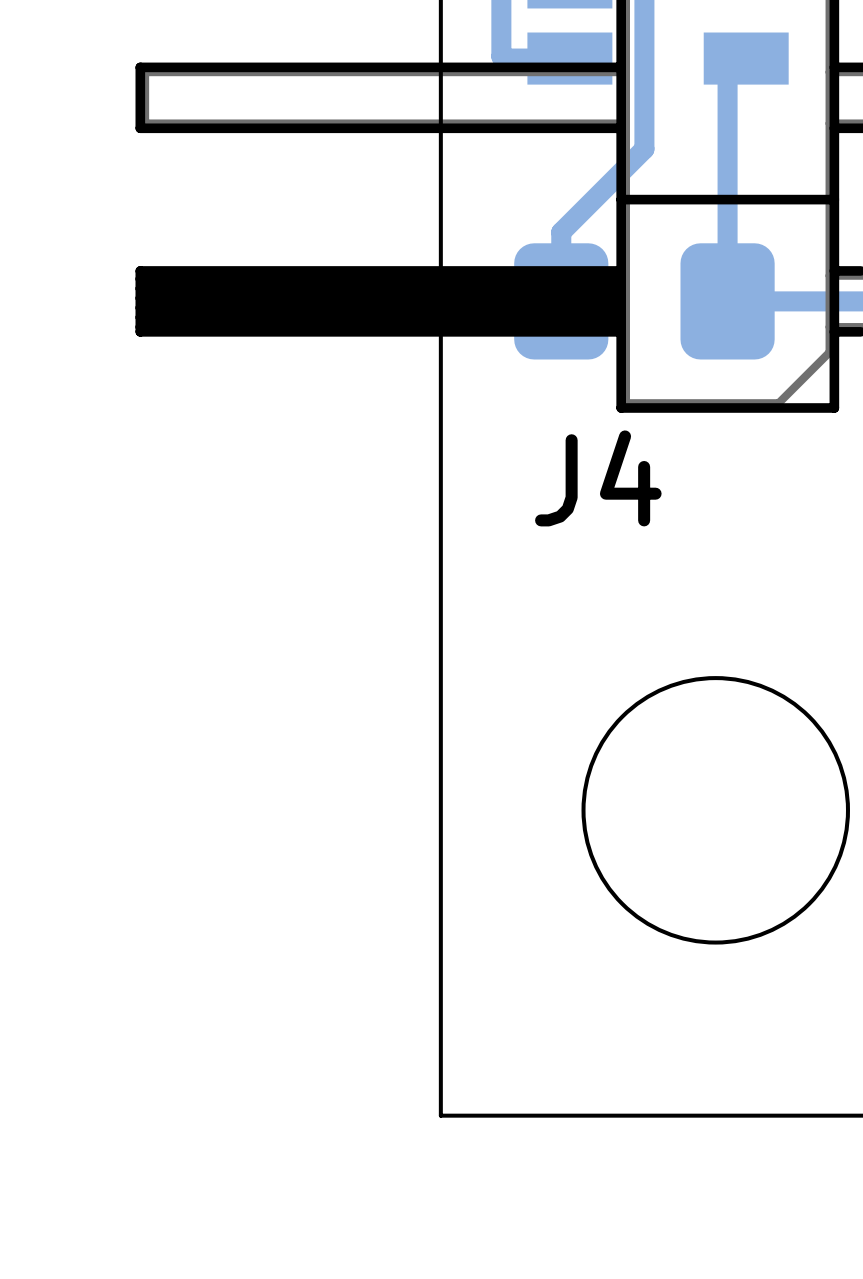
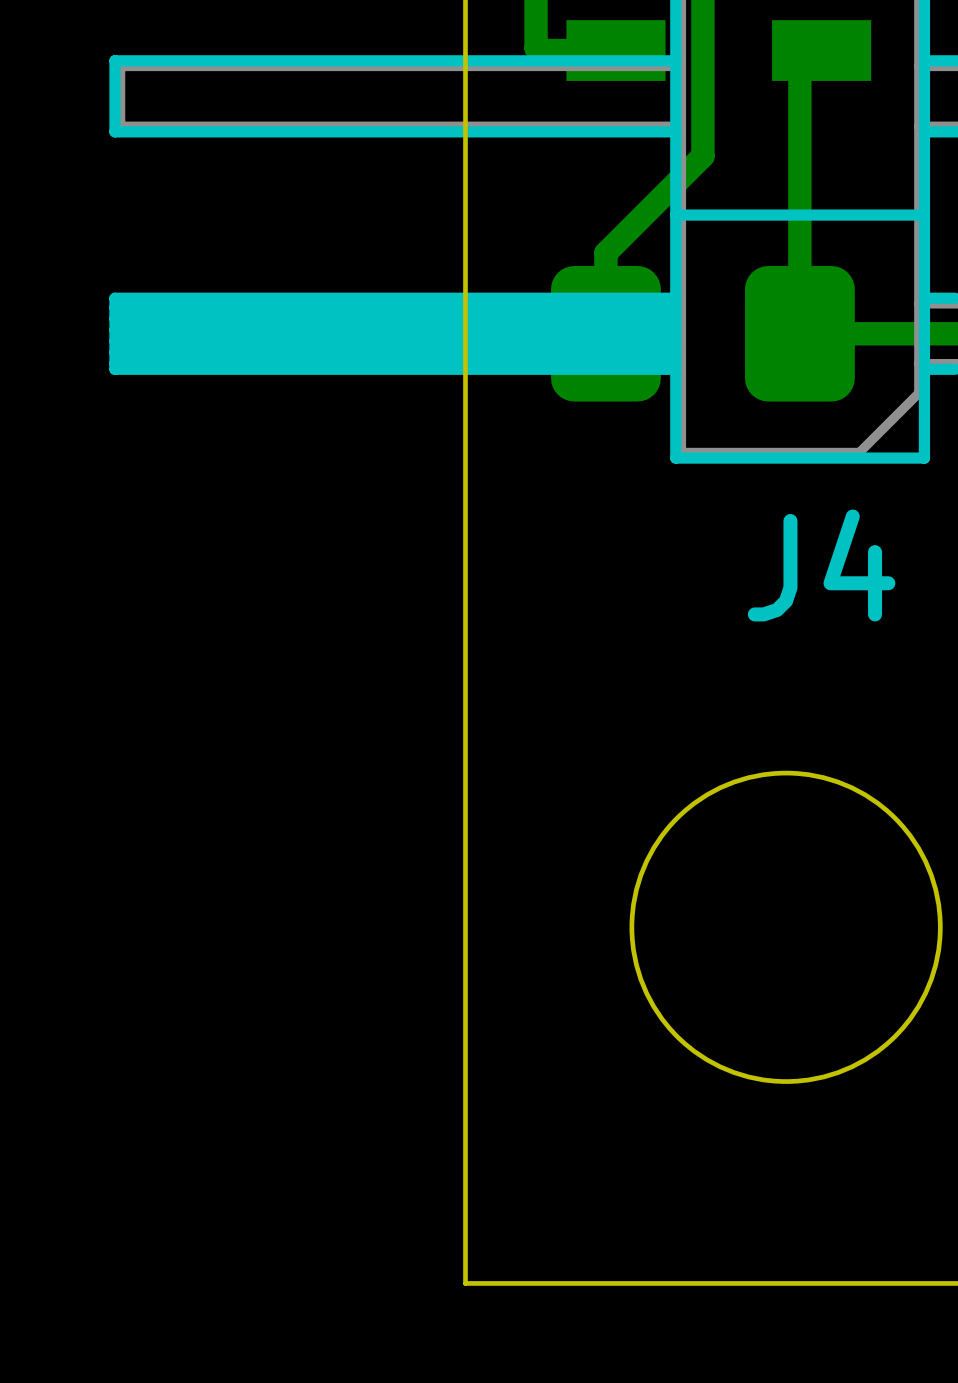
J4 name position: J4 (598, 478) -> J4 (821, 565)

